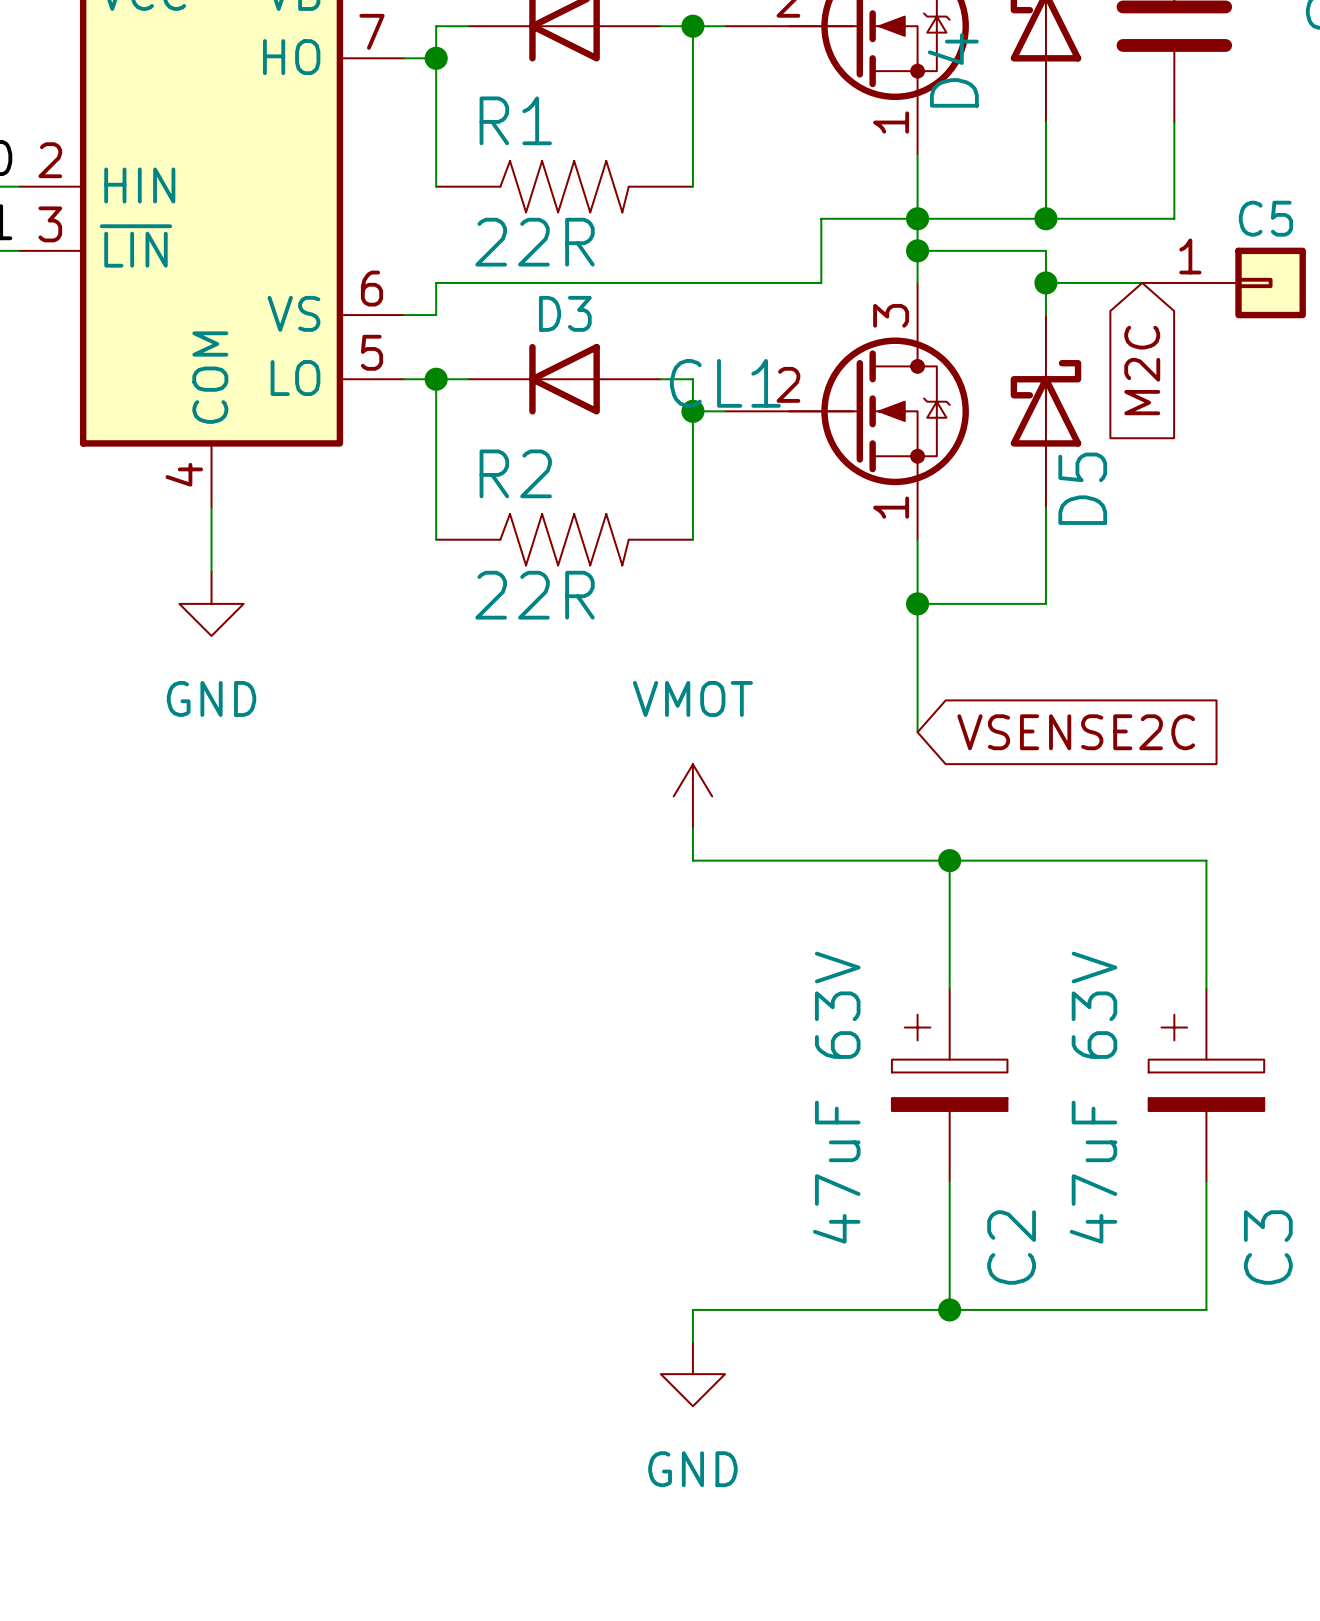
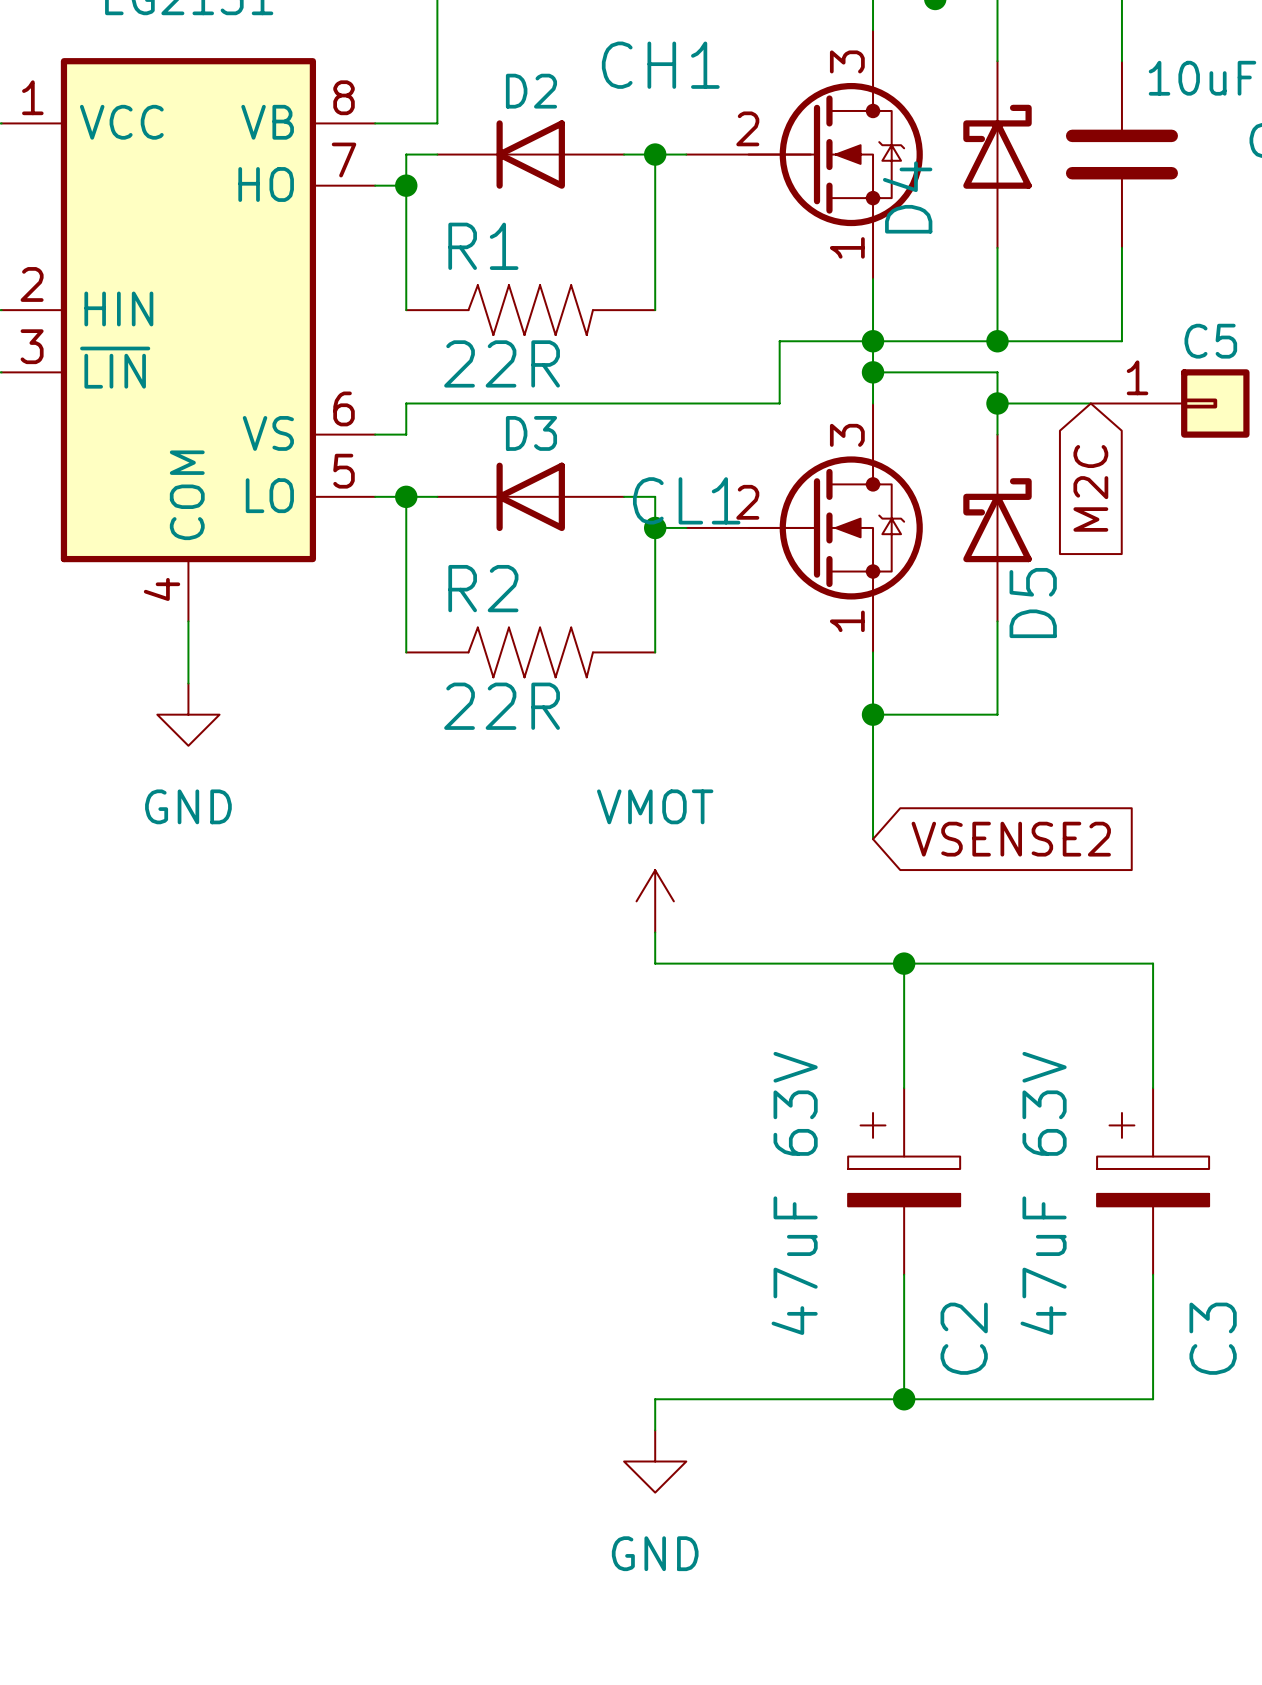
global label: VSENSE2C (1076, 732) -> VSENSE2 (1011, 839)

